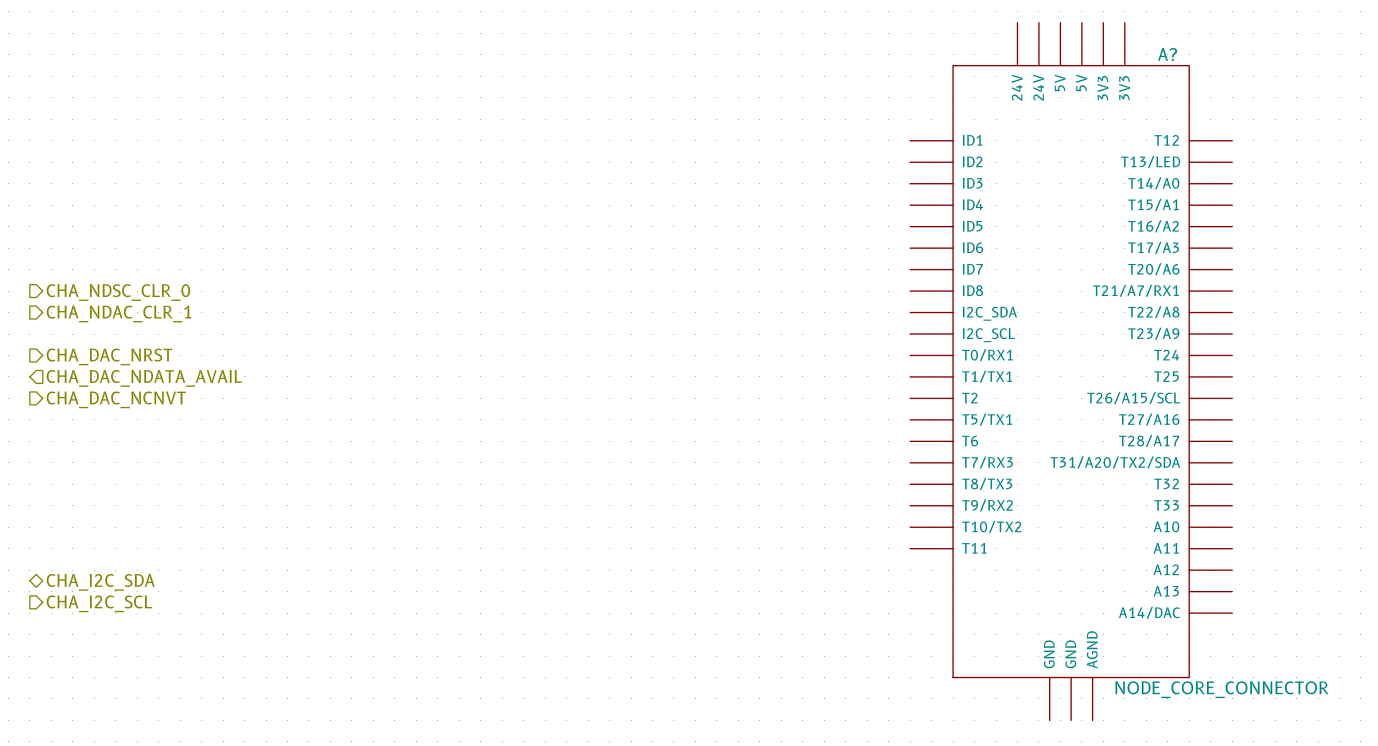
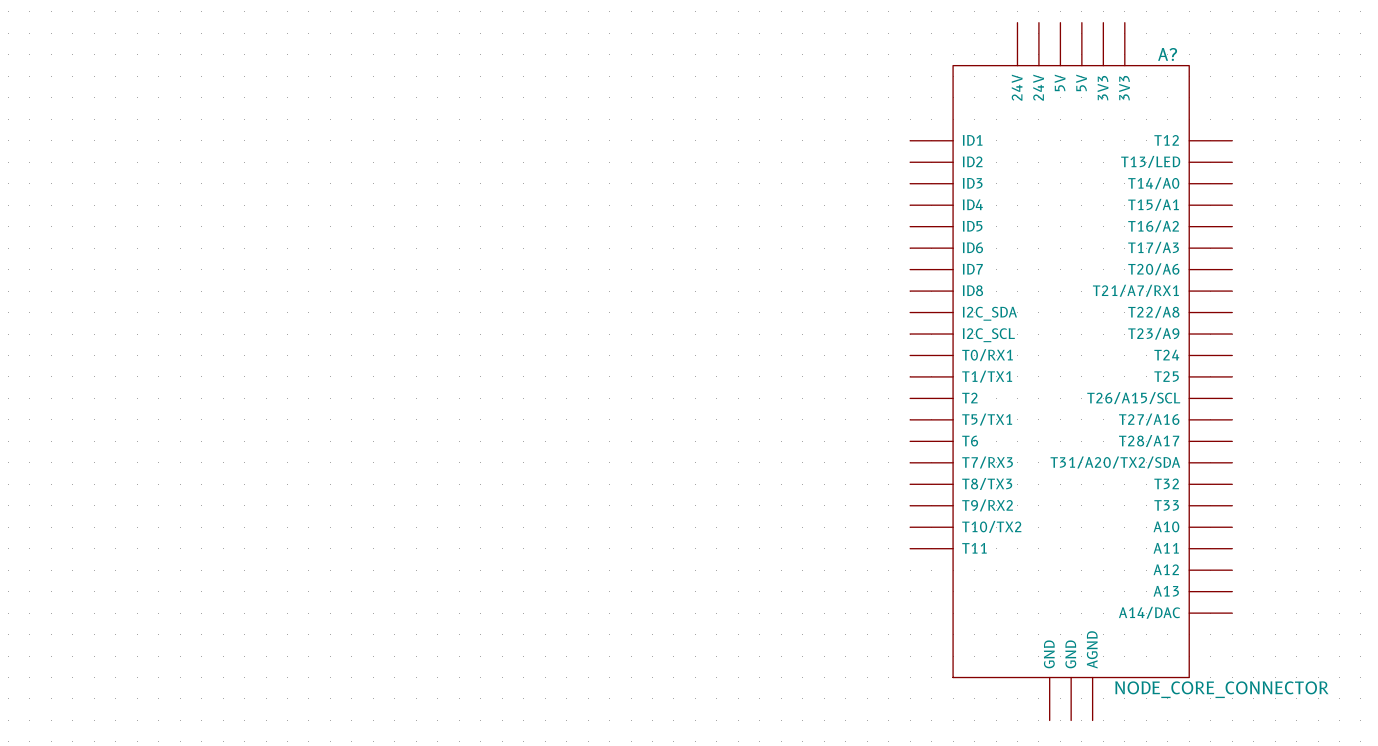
hierarchical label: CHA_NDSC_CLR_0 (118, 292) -> none
hierarchical label: CHA_NDAC_CLR_1 (119, 313) -> none
hierarchical label: CHA_DAC_NRST (109, 356) -> none
hierarchical label: CHA_DAC_NDATA_AVAIL (144, 378) -> none
hierarchical label: CHA_DAC_NCNVT (116, 399) -> none
hierarchical label: CHA_I2C_SDA (100, 582) -> none
hierarchical label: CHA_I2C_SCL (99, 603) -> none

